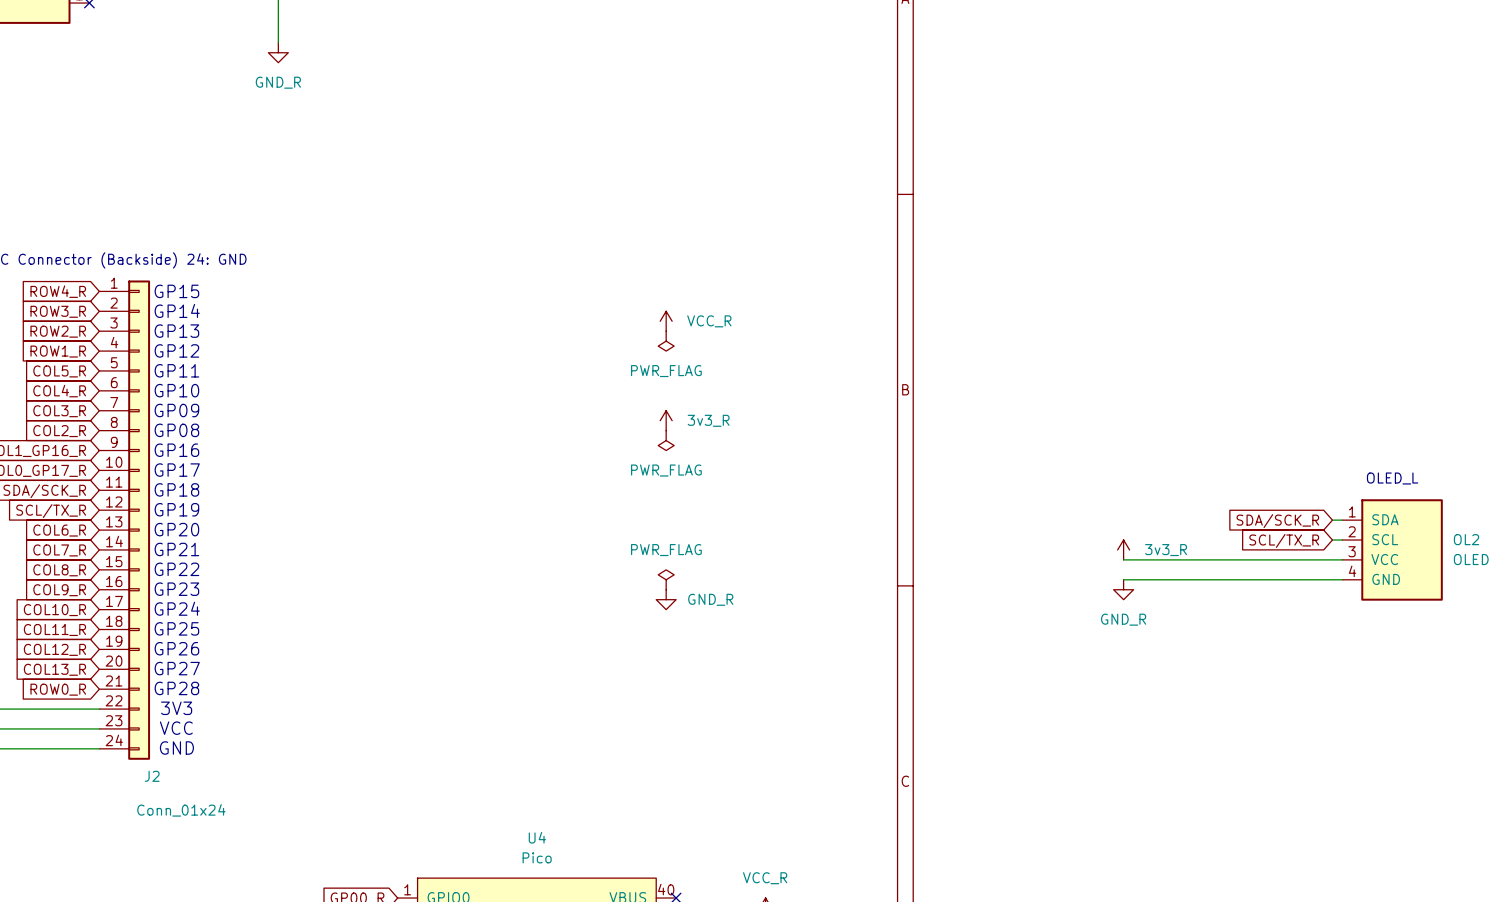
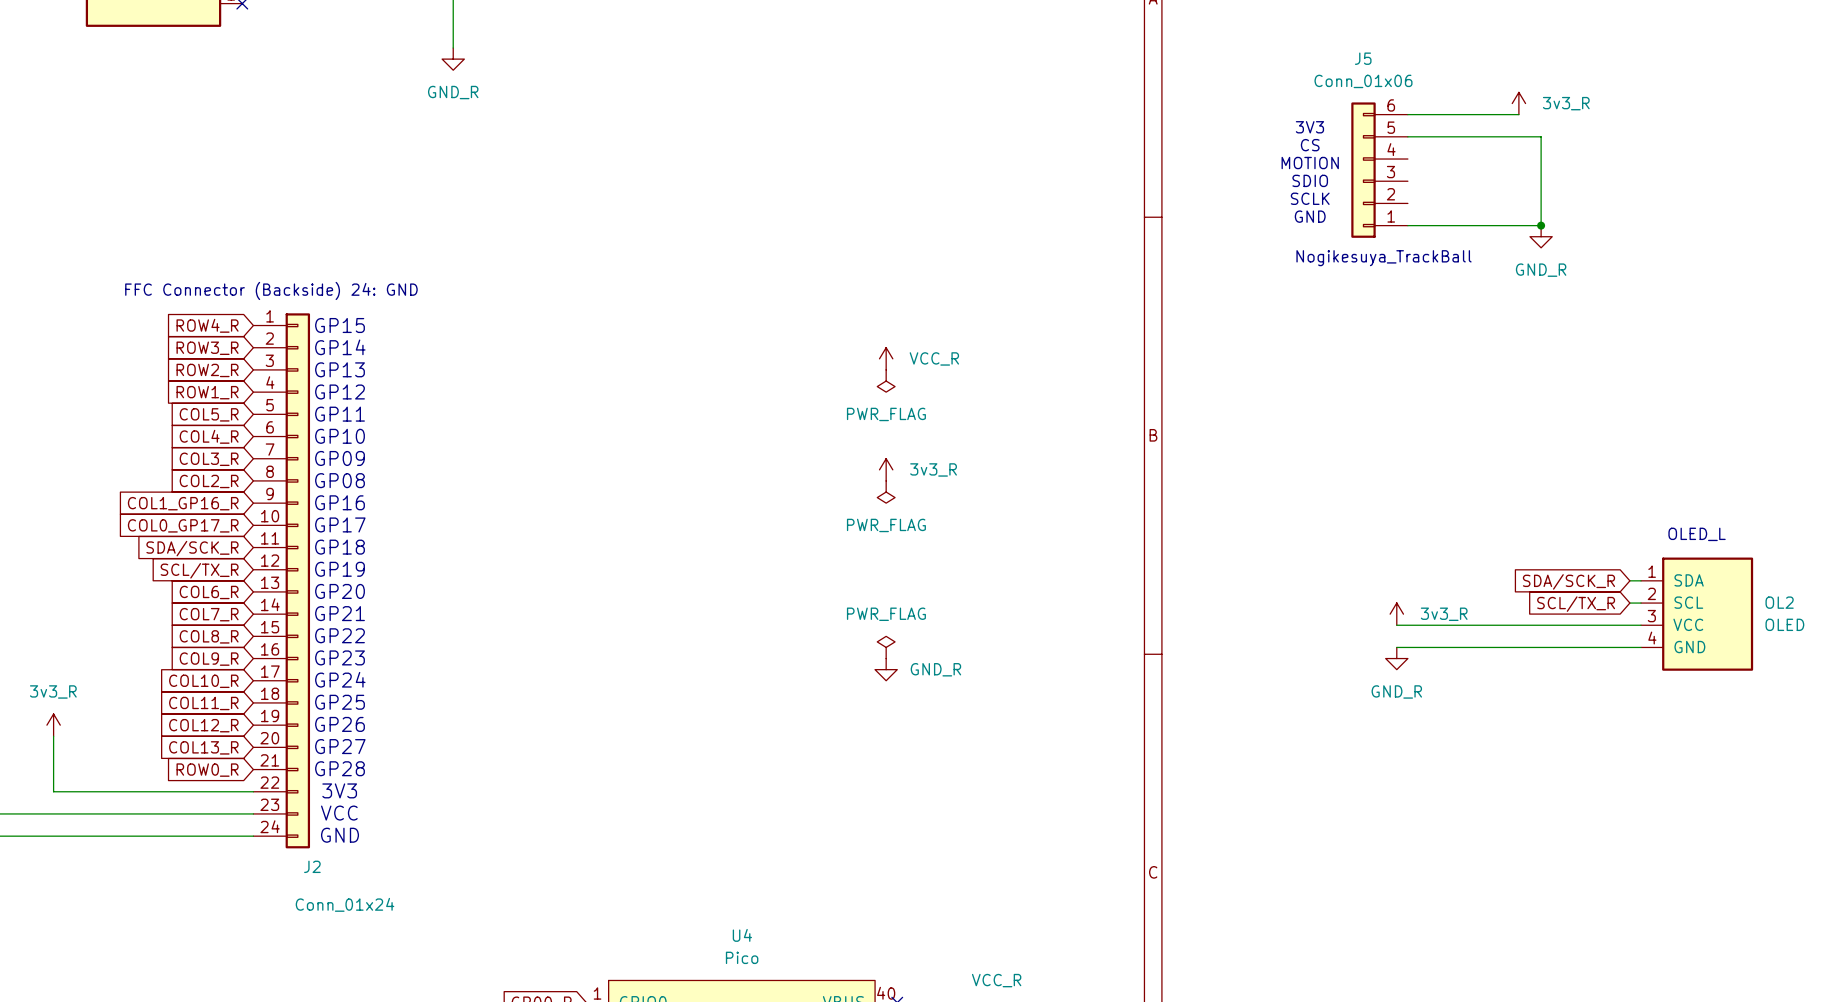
power symbol: none -> 3v3_R (1518, 103)
wire: none -> (1407, 114) (1518, 114)
text: none -> 3V3 (1309, 127)
wire: none -> (1407, 136) (1541, 136) (1541, 225) (1407, 225)
text: none -> CS (1310, 145)
text: none -> MOTION (1310, 163)
J5: none -> Conn_01x06 (1379, 170)
text: none -> SDIO (1310, 180)
text: none -> SCLK (1310, 198)
text: none -> GND (1310, 216)
junction: none -> (1541, 225)
power symbol: none -> GND_R (1541, 236)
text: none -> Nogikesuya_TrackBall (1384, 258)

